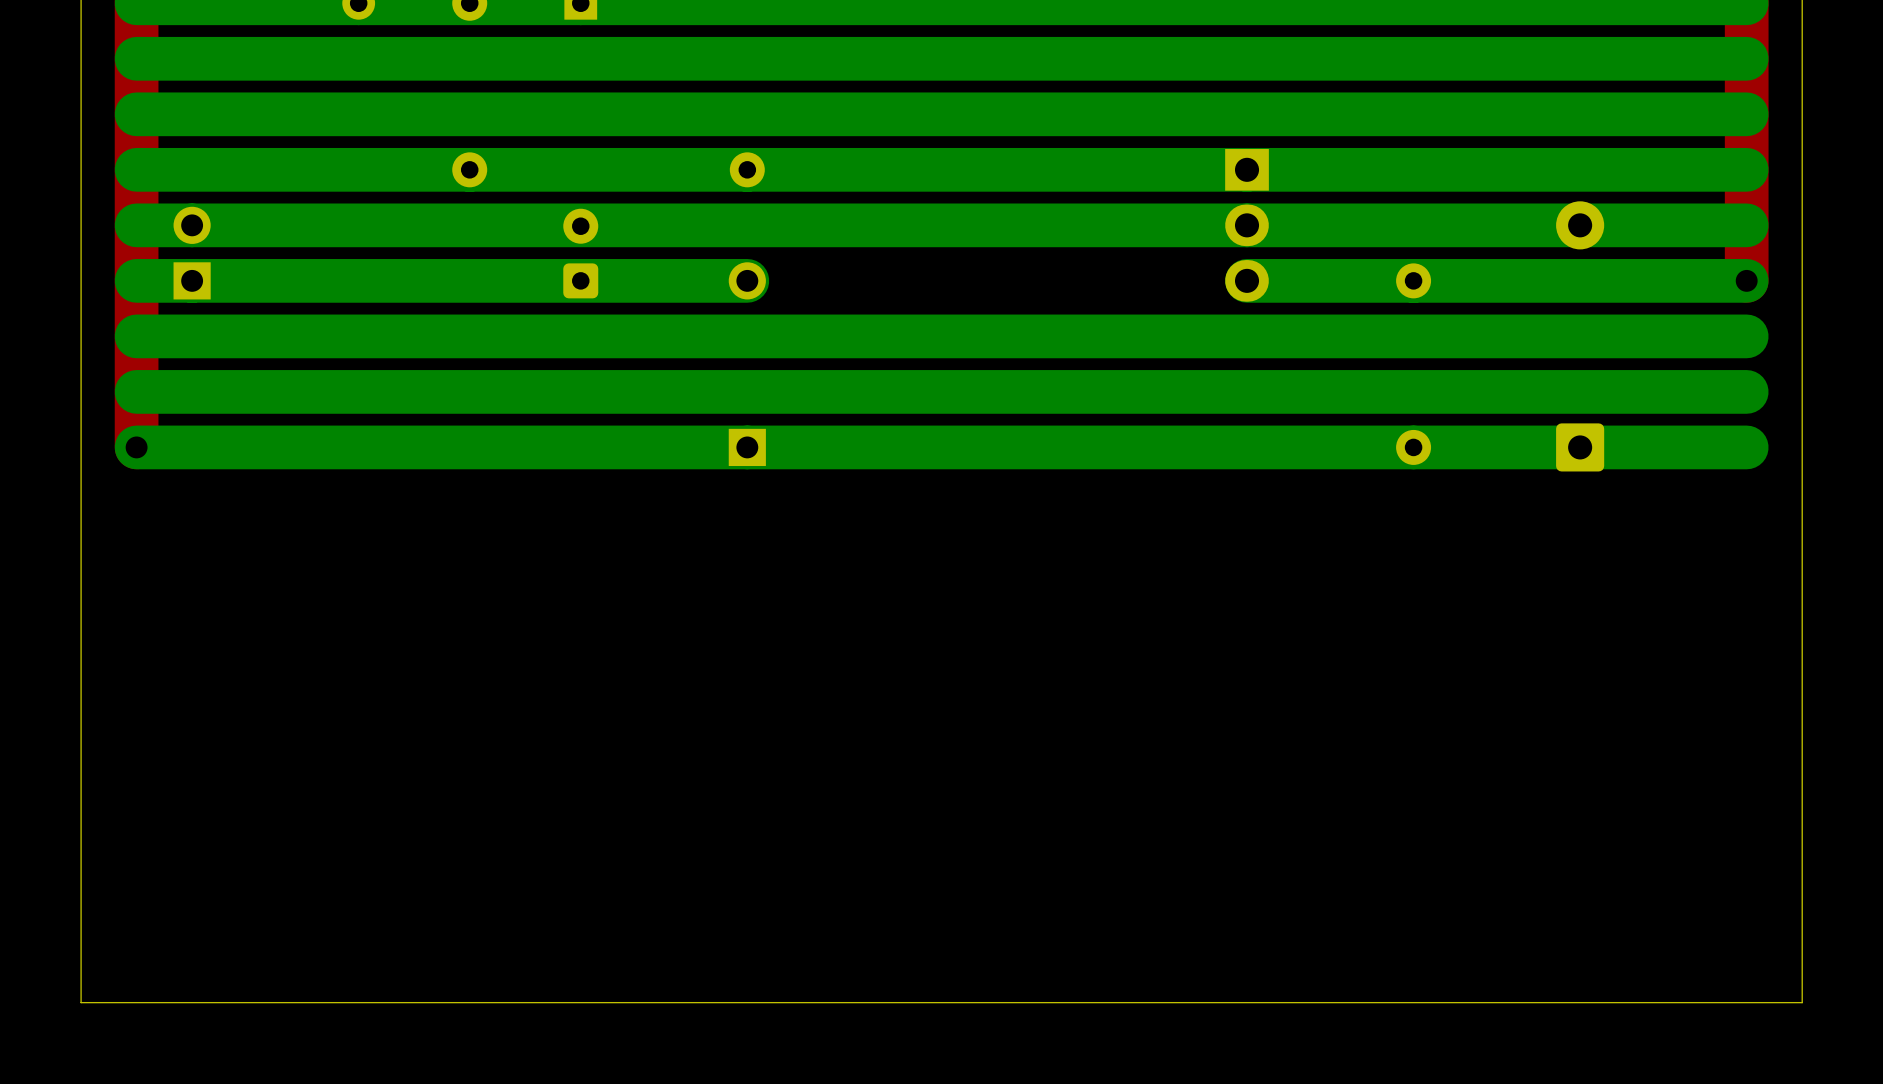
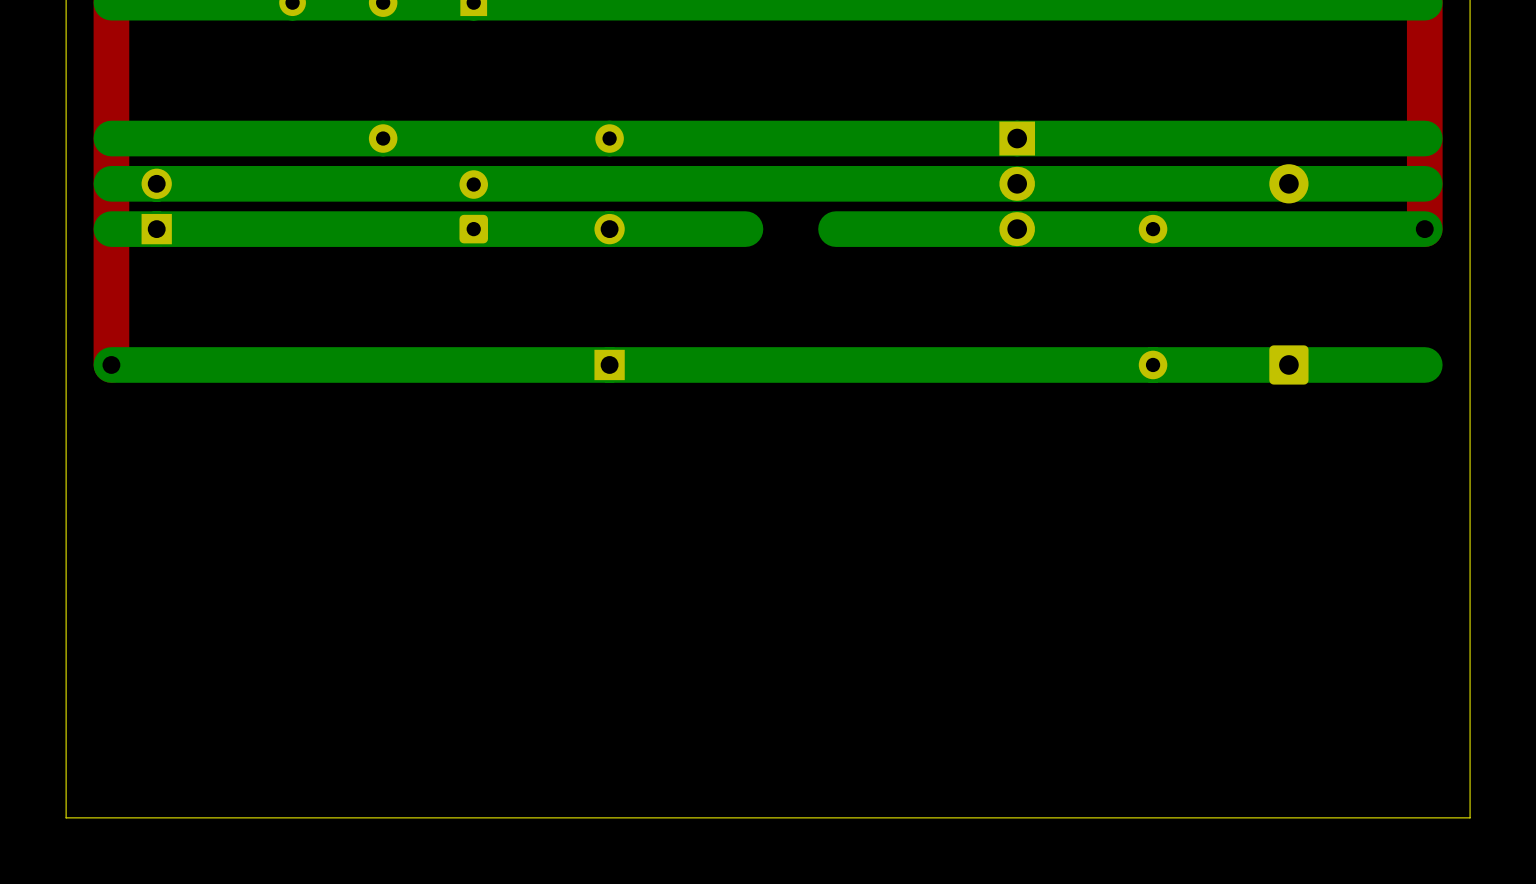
bottom track: (1746, 58) (136, 58) -> none
bottom track: (1746, 114) (136, 114) -> none
bottom track: none -> (745, 229) (609, 229)
bottom track: none -> (1017, 229) (836, 229)
bottom track: (1746, 336) (136, 336) -> none
bottom track: (1746, 391) (136, 391) -> none

